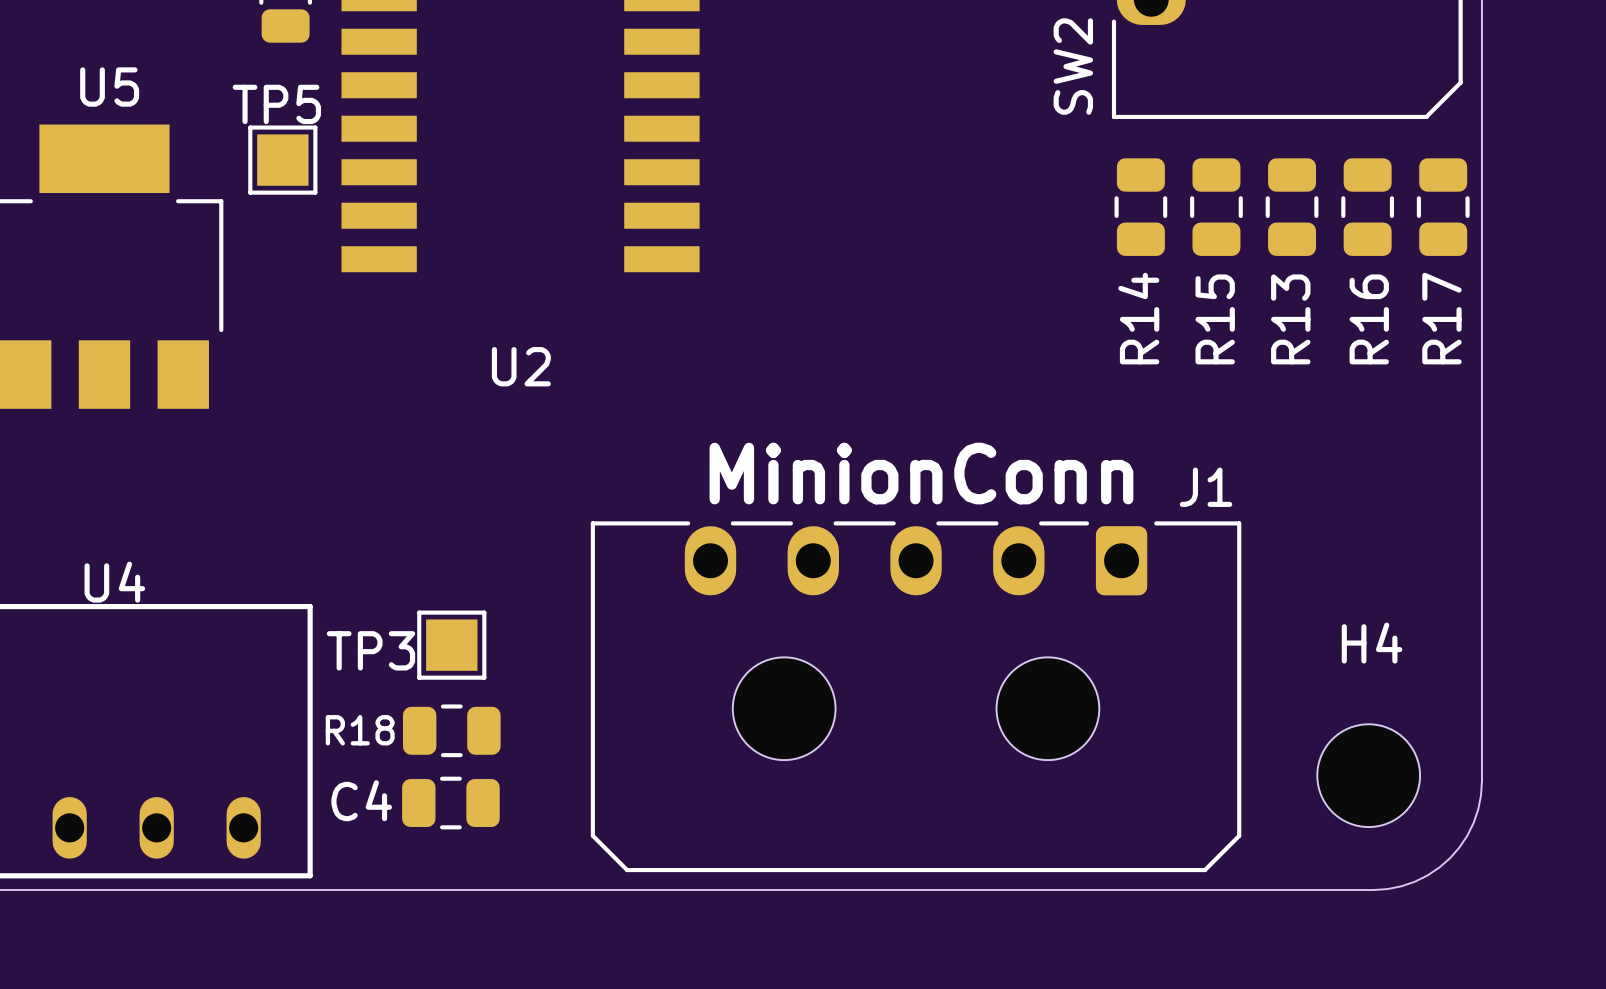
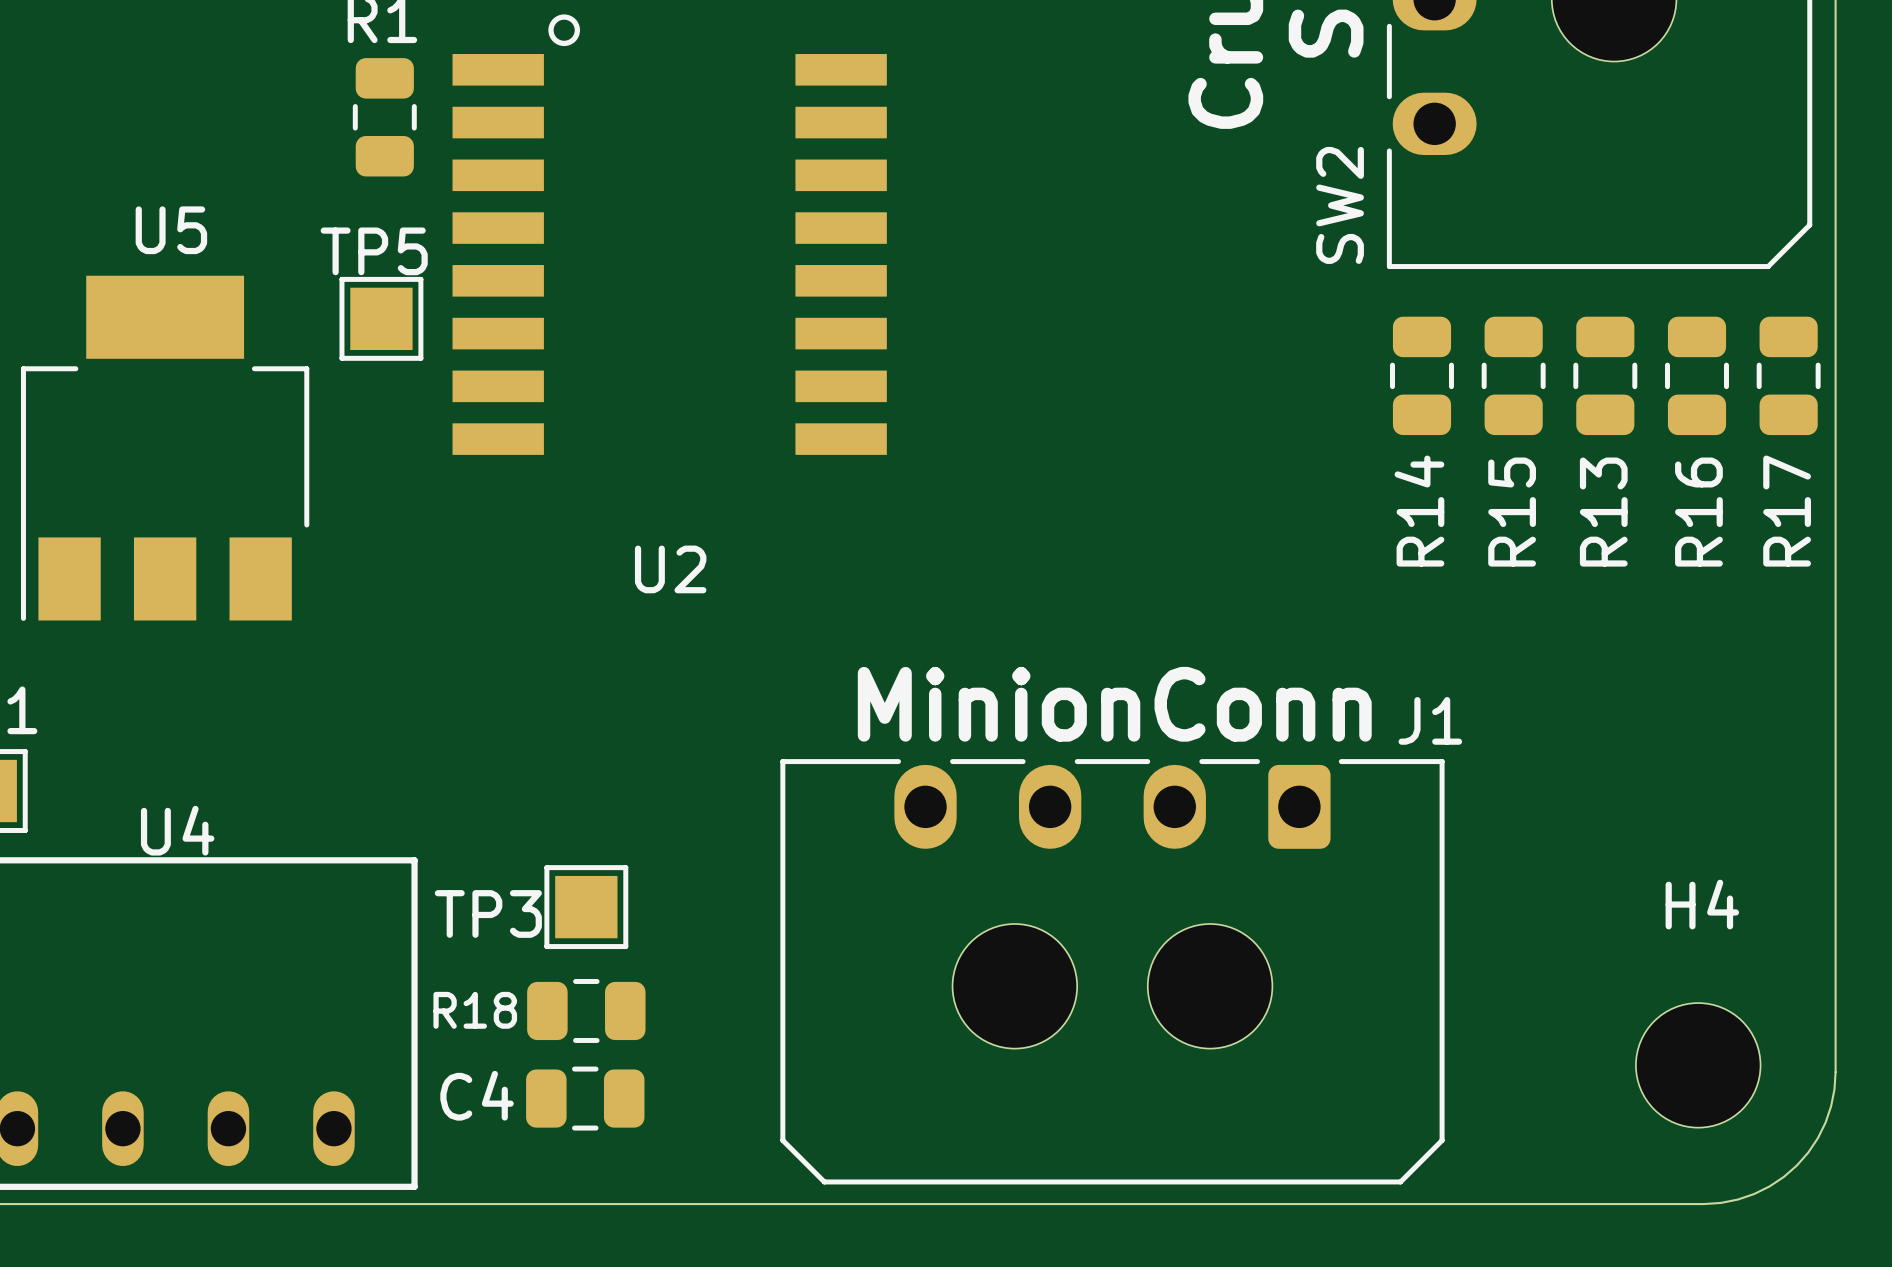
text position: MinionConn (921, 473) -> MinionConn (1114, 704)
J1 footprint: [590, 521, 1242, 873] -> [780, 759, 1445, 1185]

